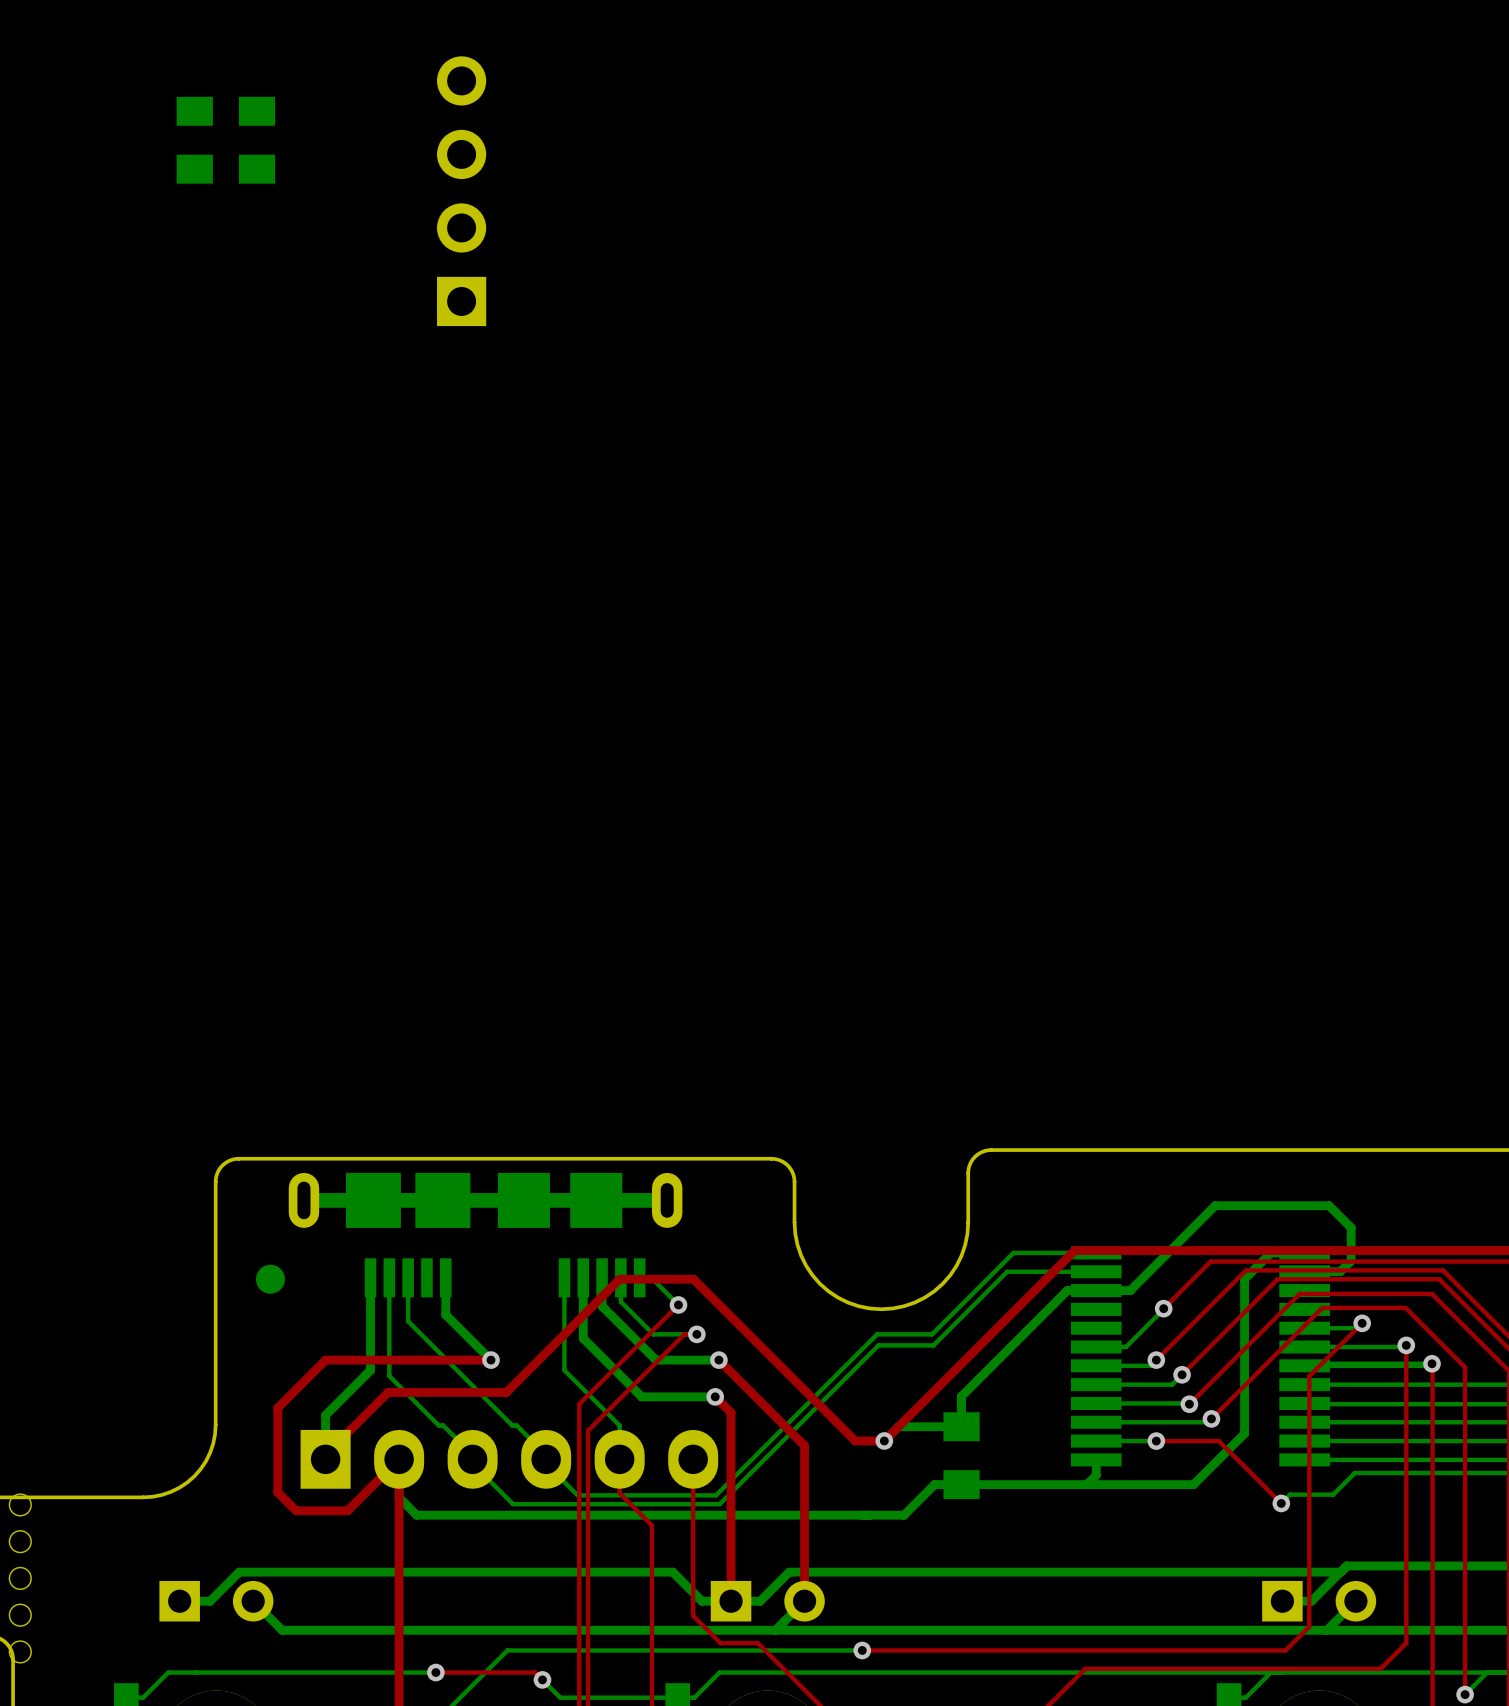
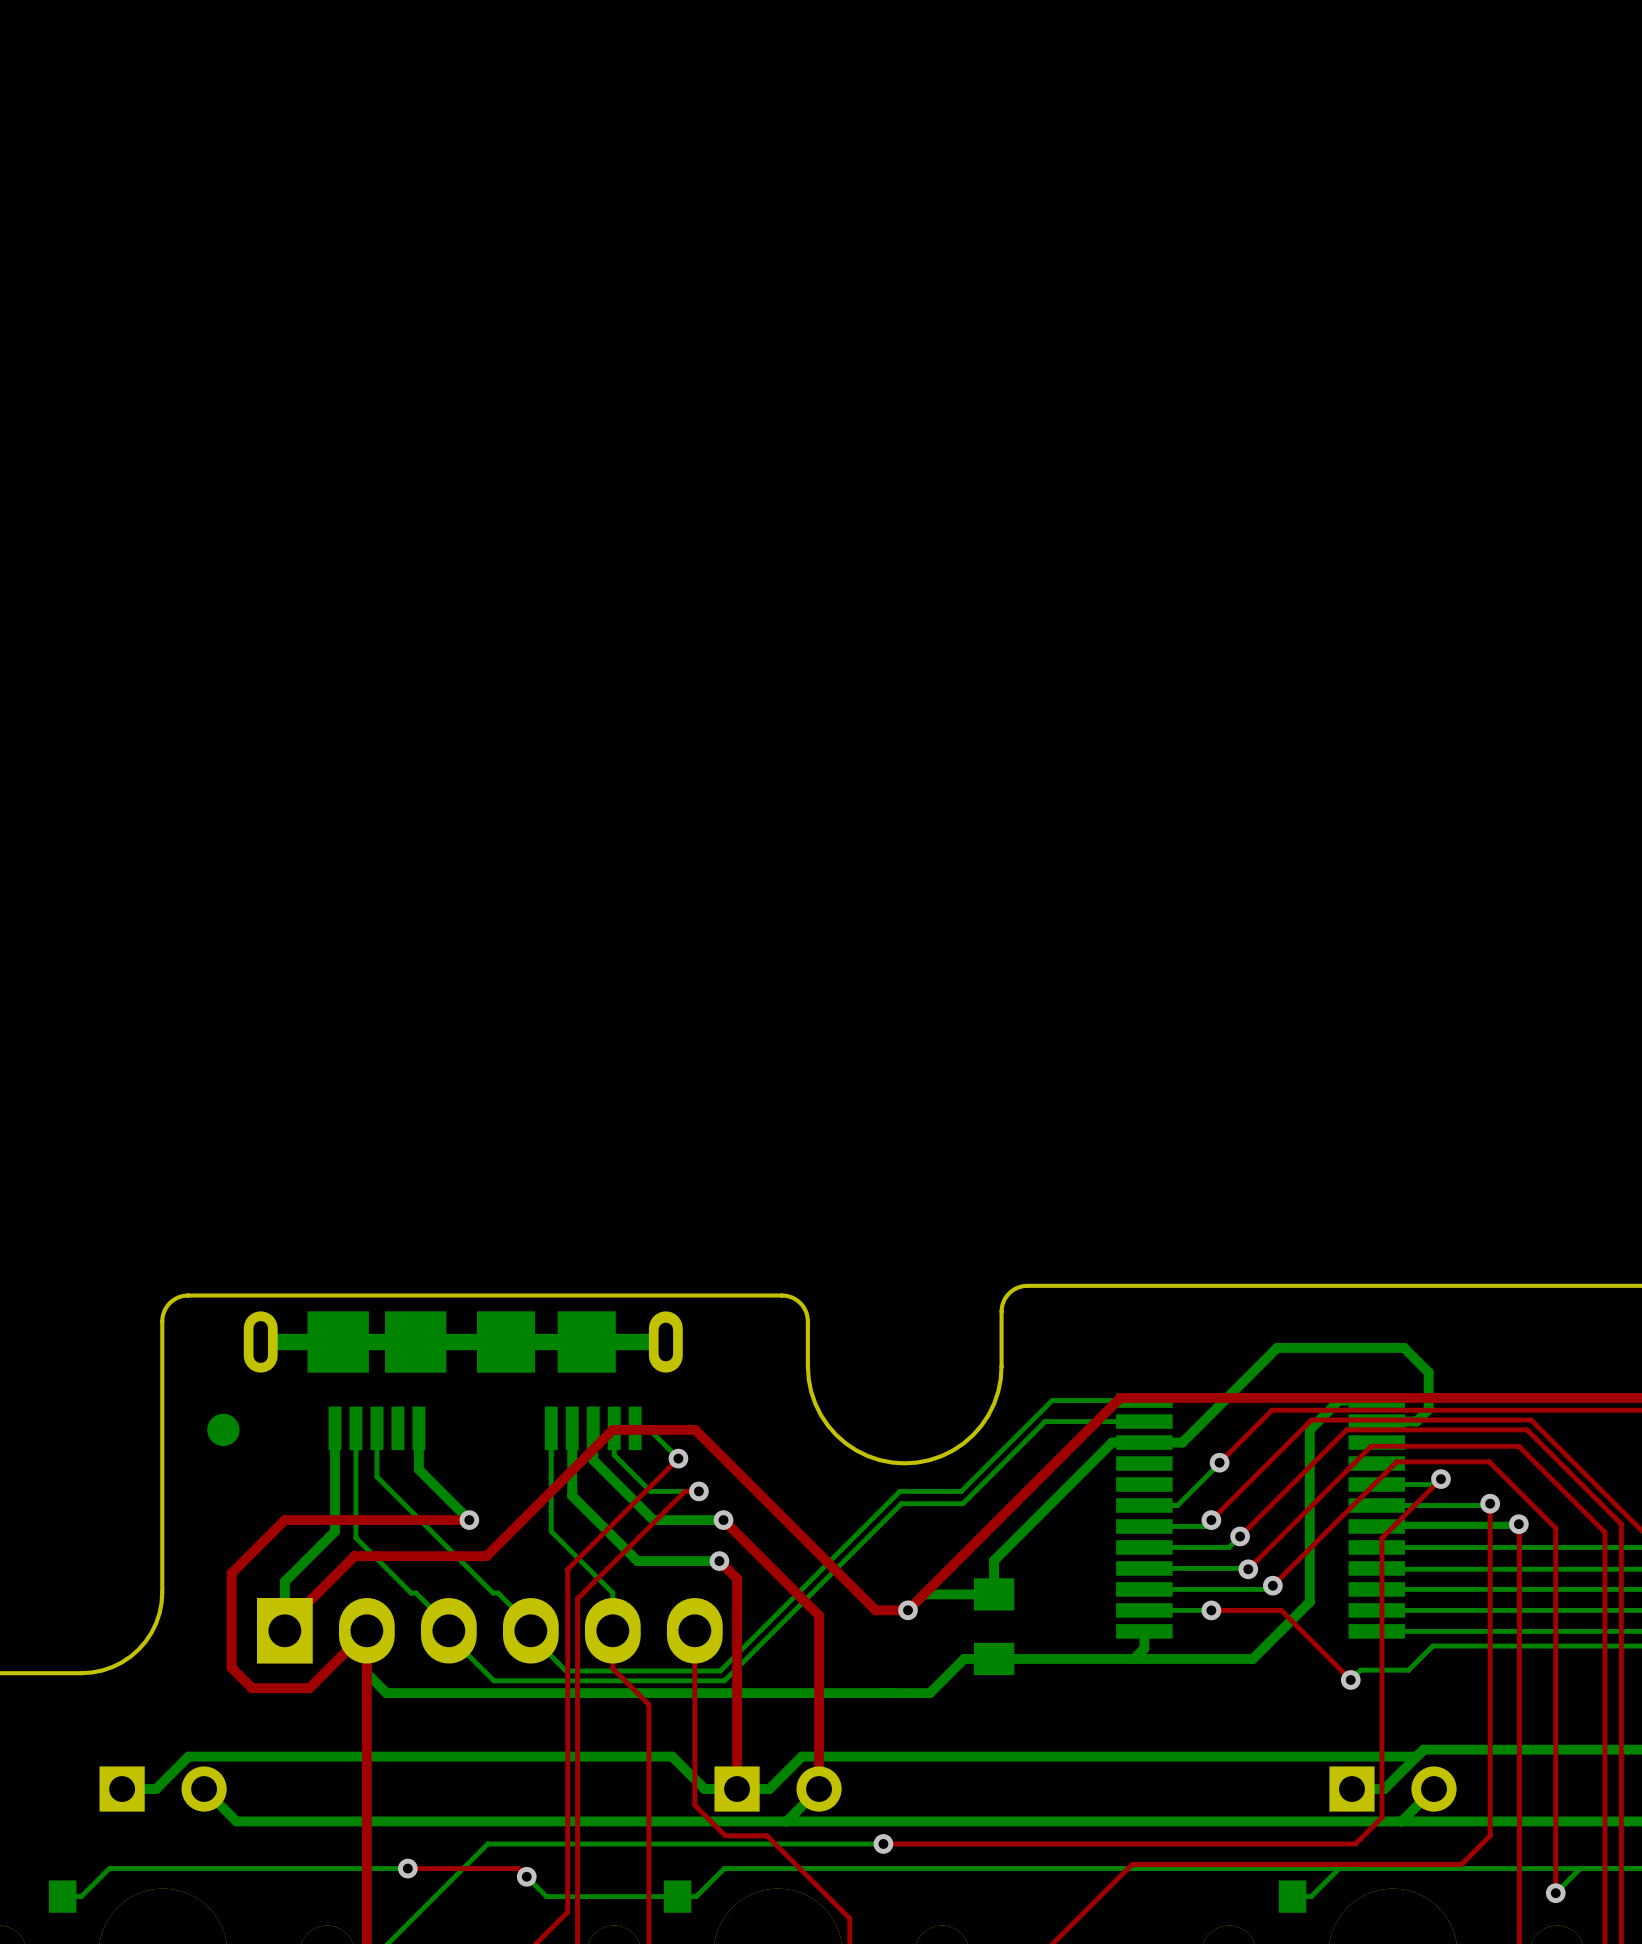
part: (194, 140) -> none
part: (257, 140) -> none
part: (461, 191) -> none

